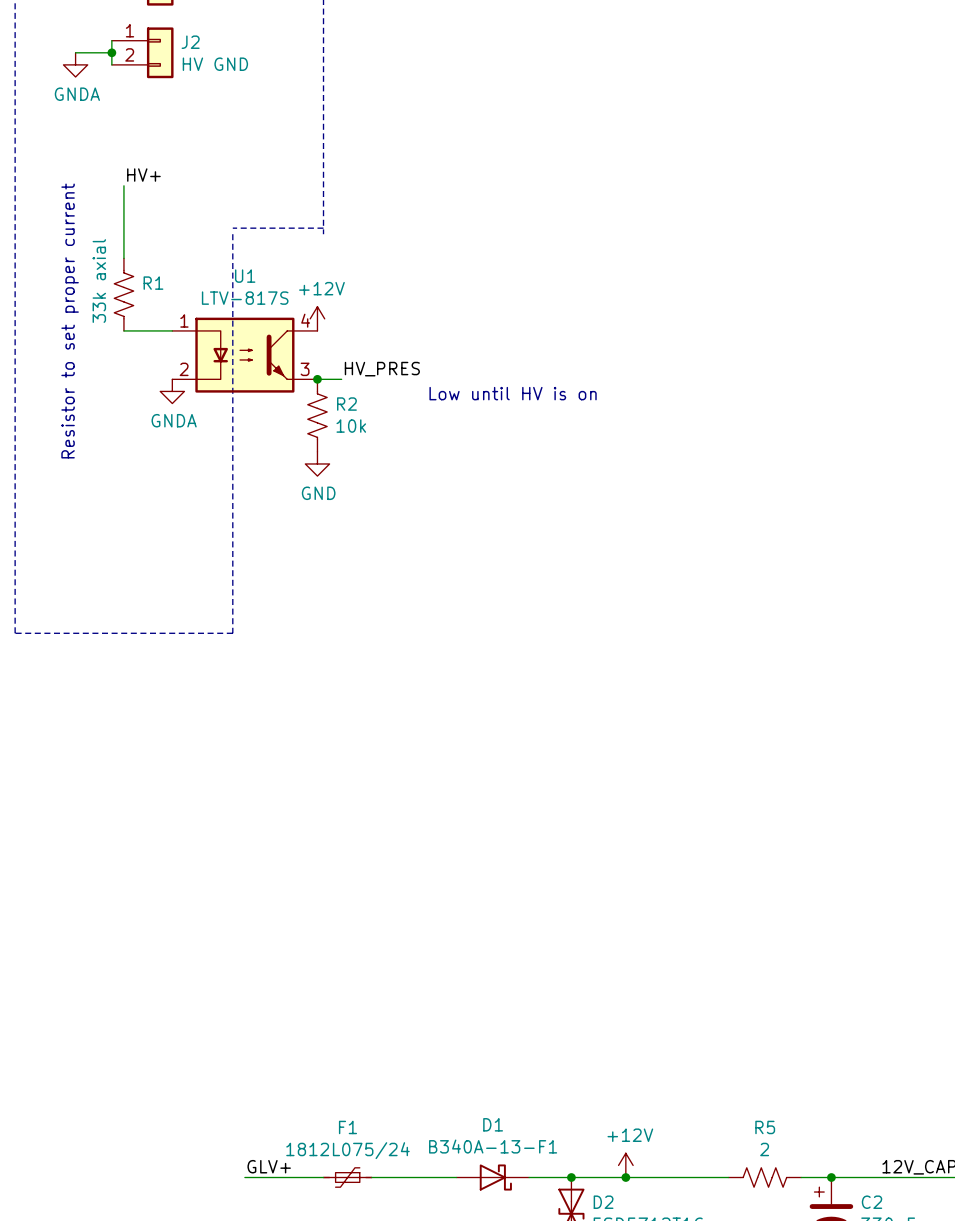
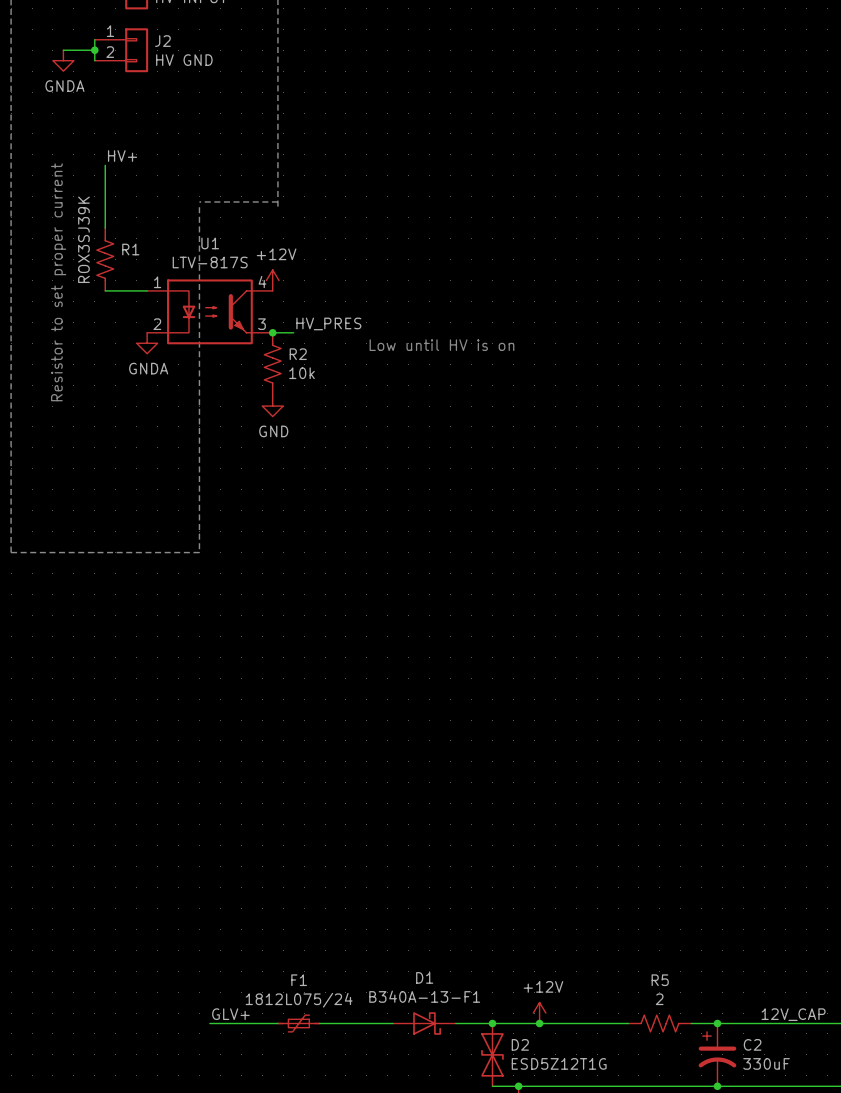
R1 value: 33k axial (99, 281) -> ROX3SJ39K (83, 239)

